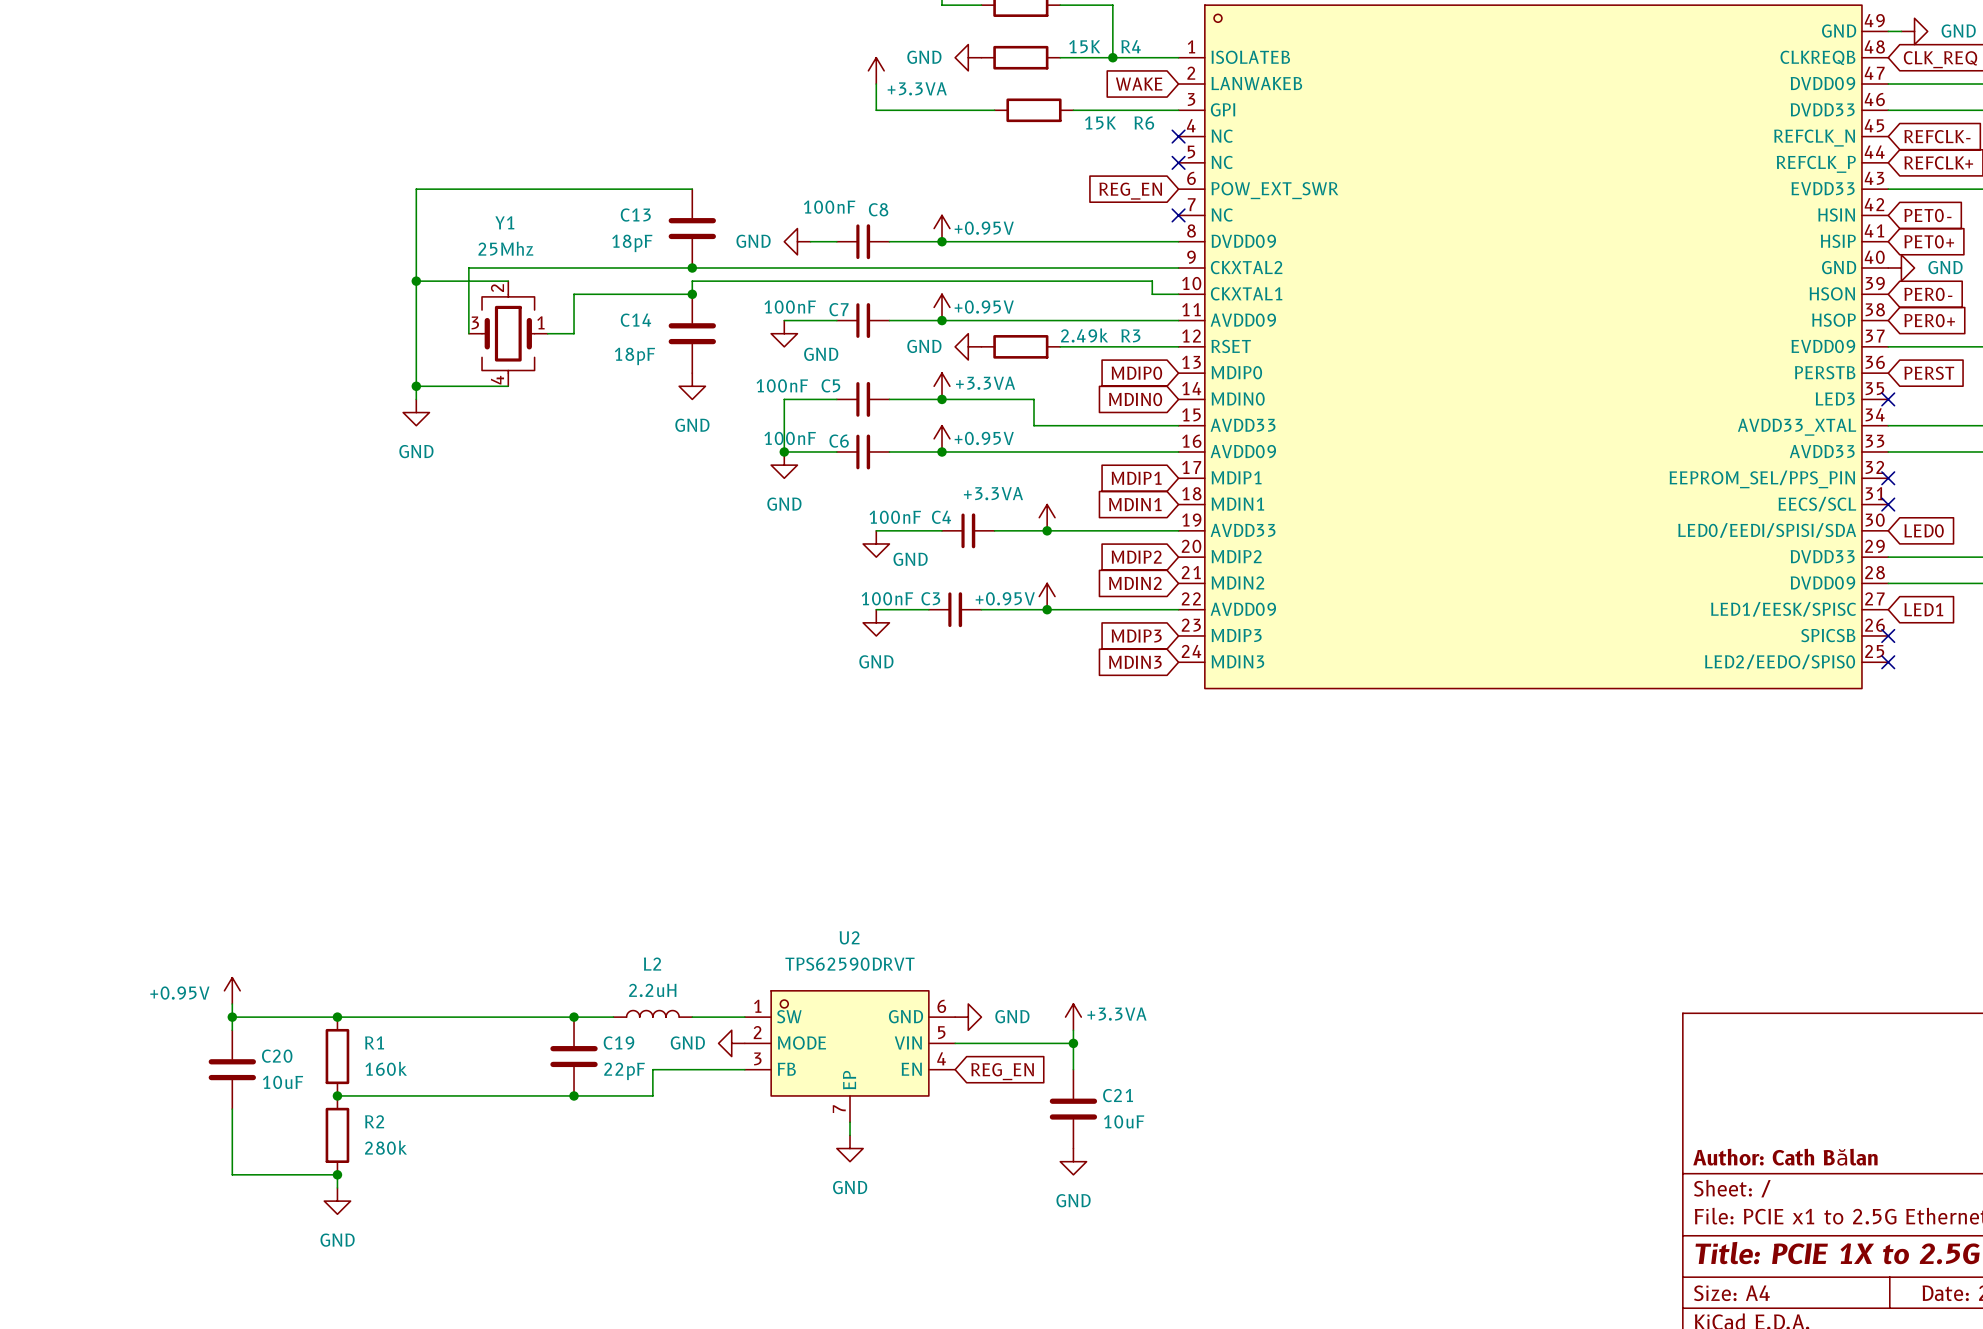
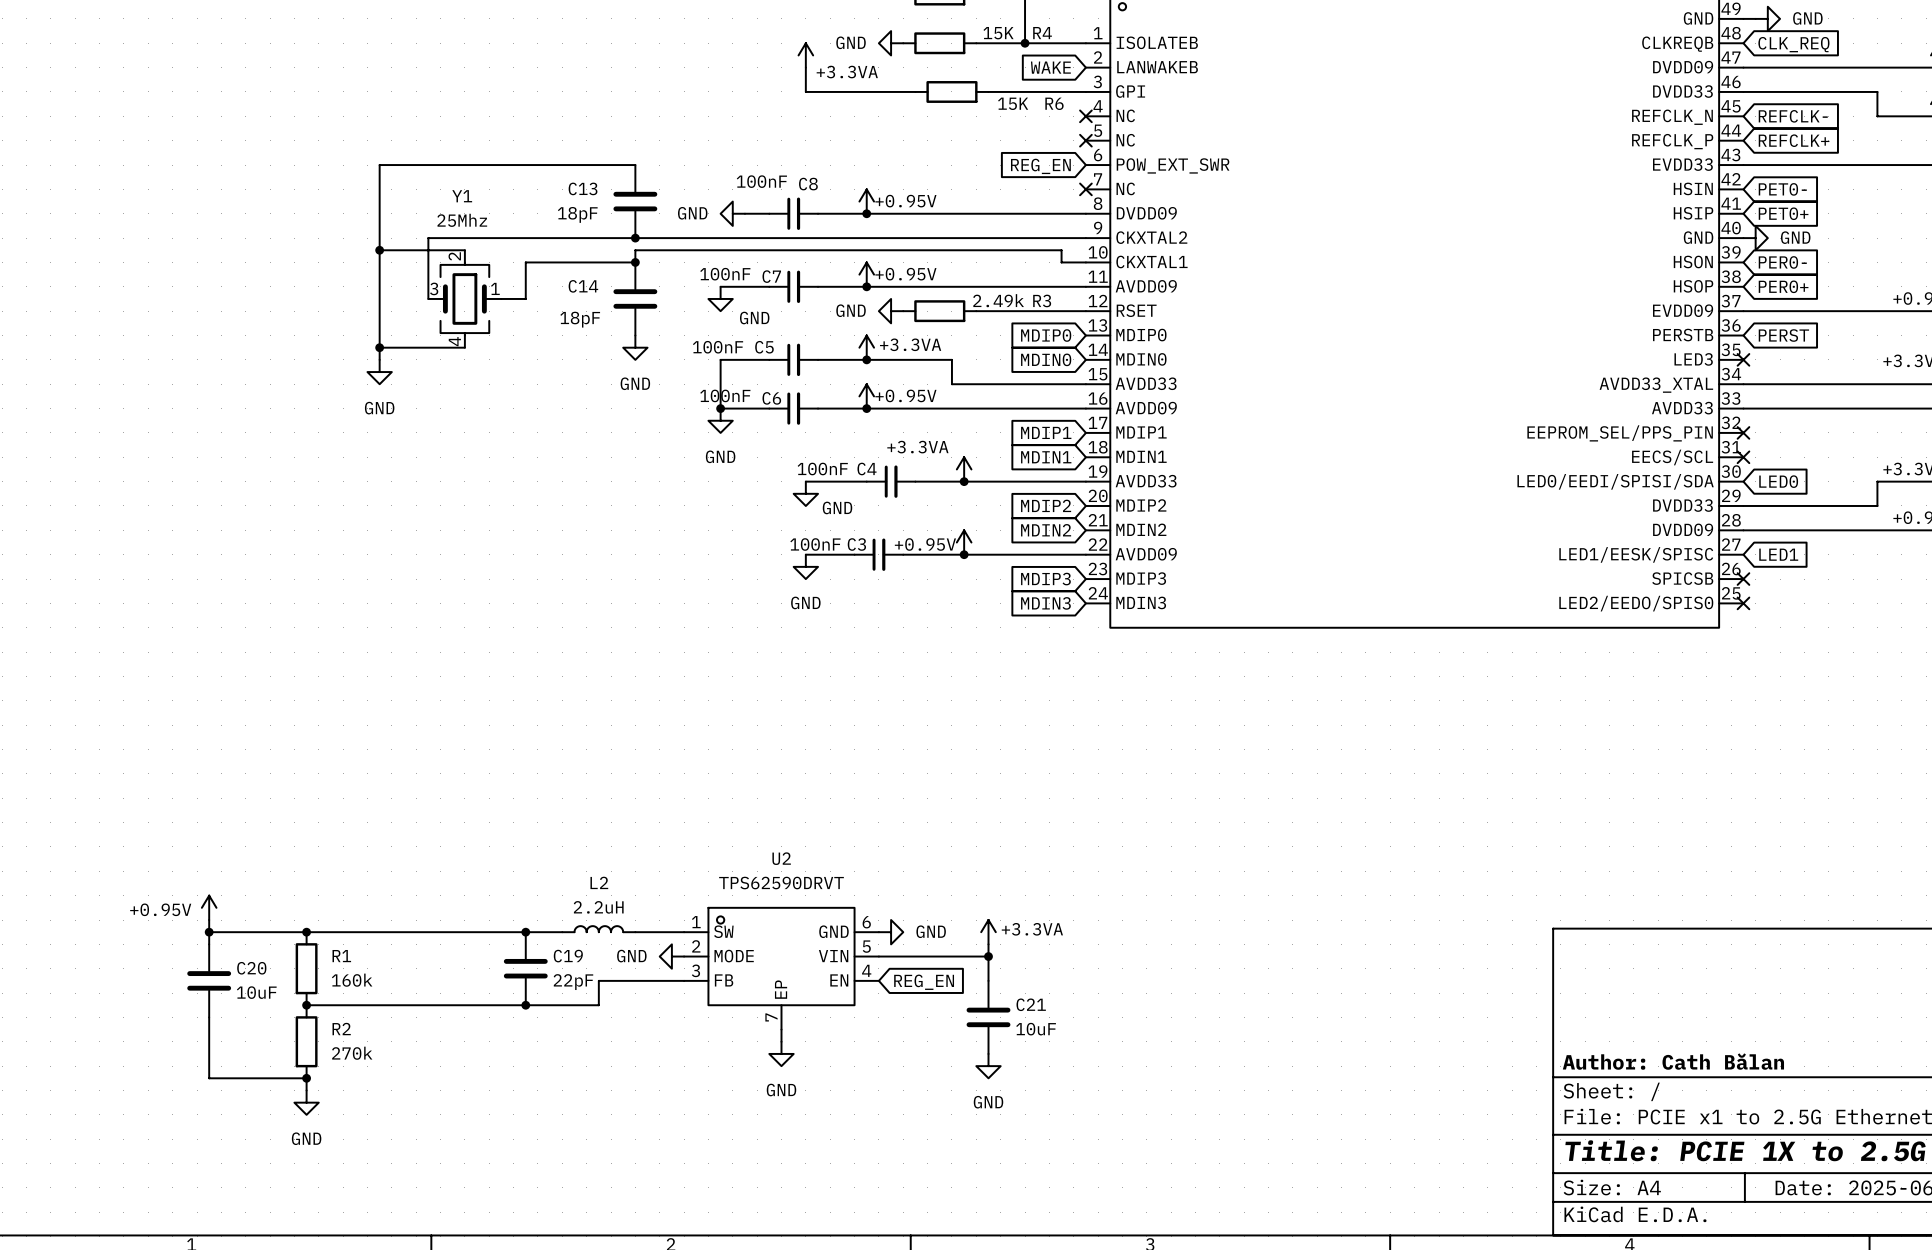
R2 value: 280k (386, 1147) -> 270k (352, 1053)

